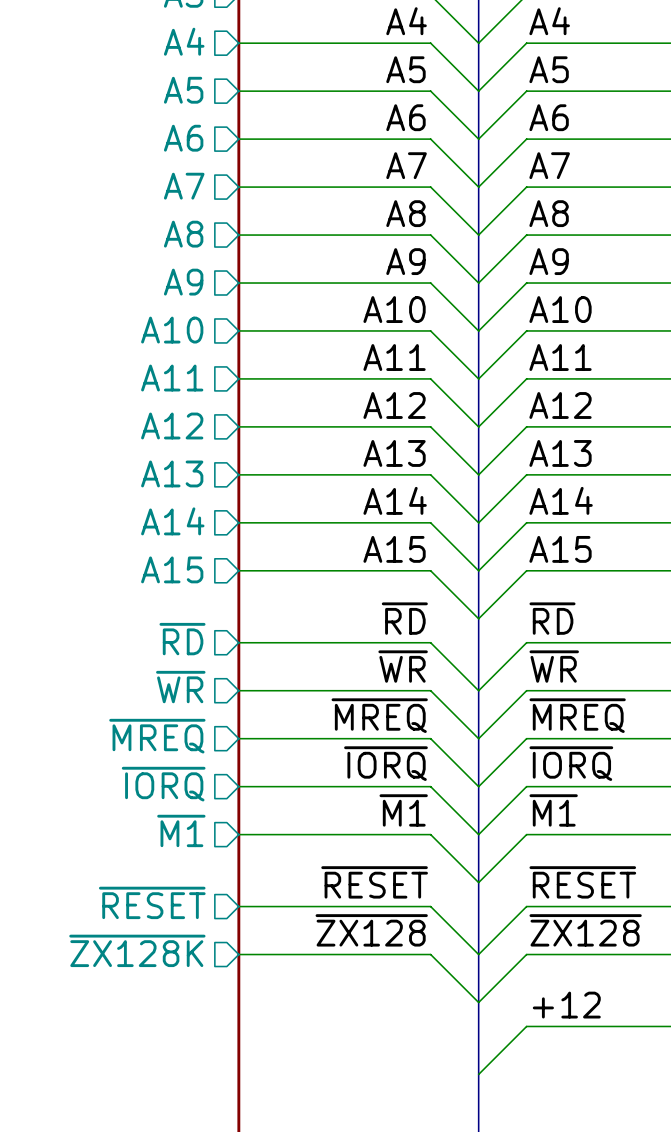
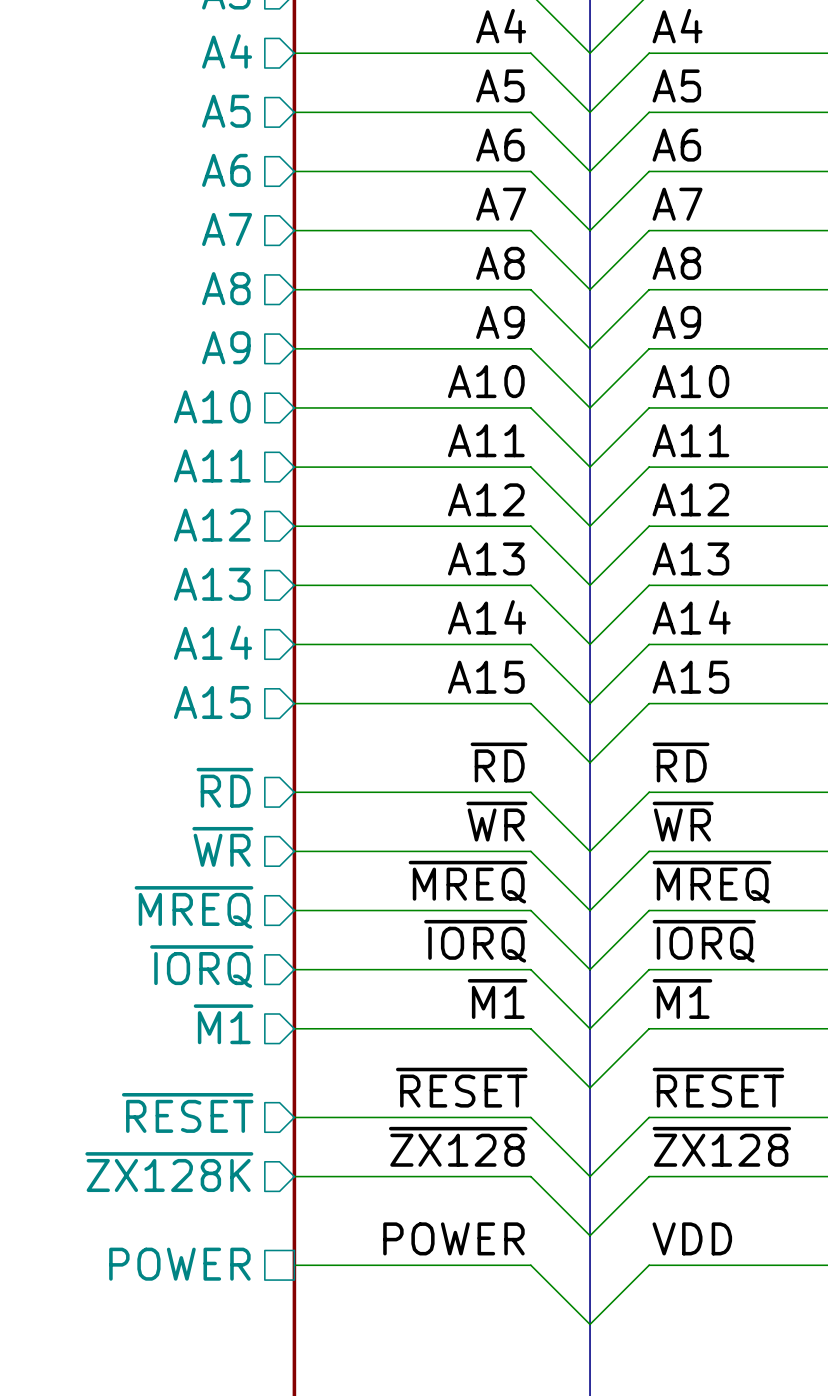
label: none -> POWER (453, 1238)
label: +12 (566, 1005) -> VDD (692, 1238)
sheet pin: none -> POWER (179, 1264)
wire: none -> (294, 1265) (530, 1265) (590, 1324)

